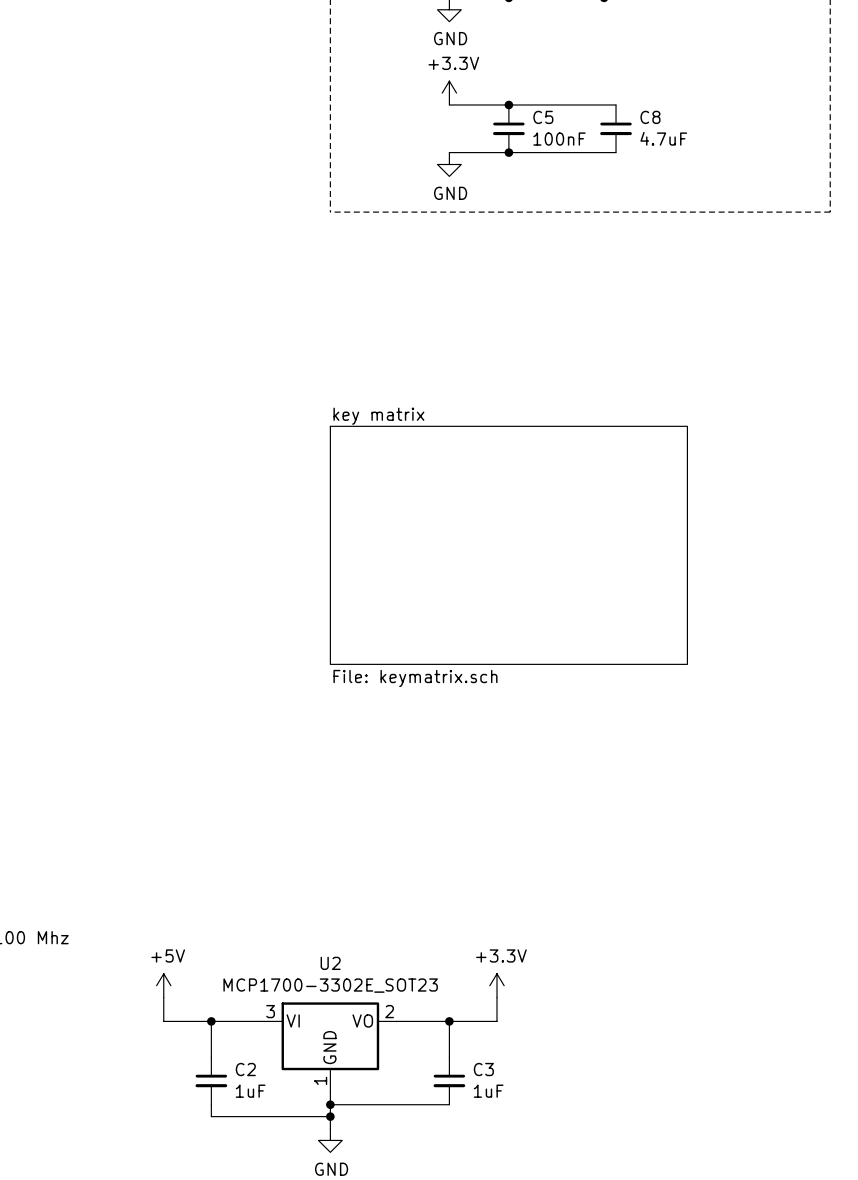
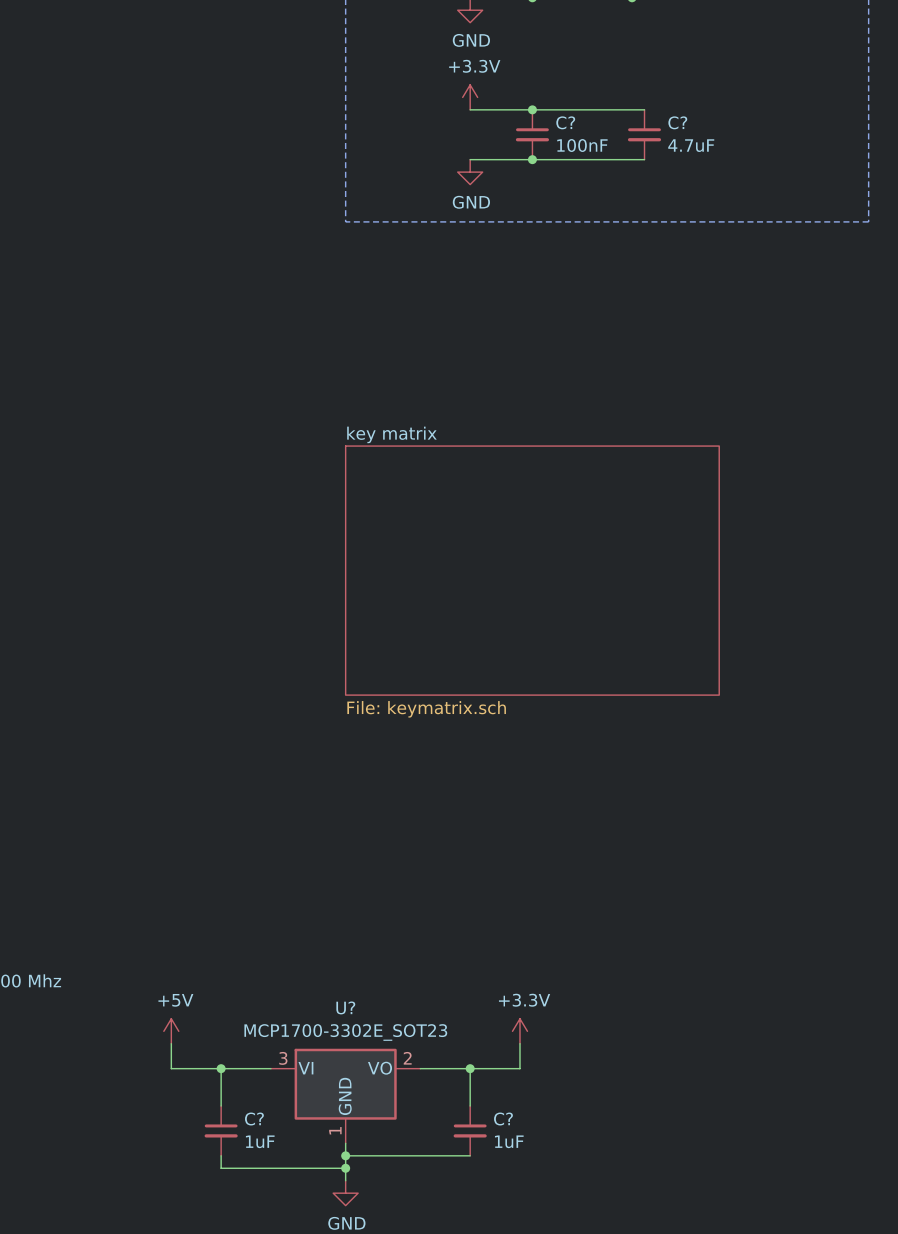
C5 name: C5 (543, 117) -> C? (565, 122)
C8 name: C8 (650, 117) -> C? (677, 122)
U2 name: U2 (330, 963) -> U? (345, 1007)
C2 name: C2 (245, 1069) -> C? (254, 1119)
C3 name: C3 (483, 1069) -> C? (503, 1119)

